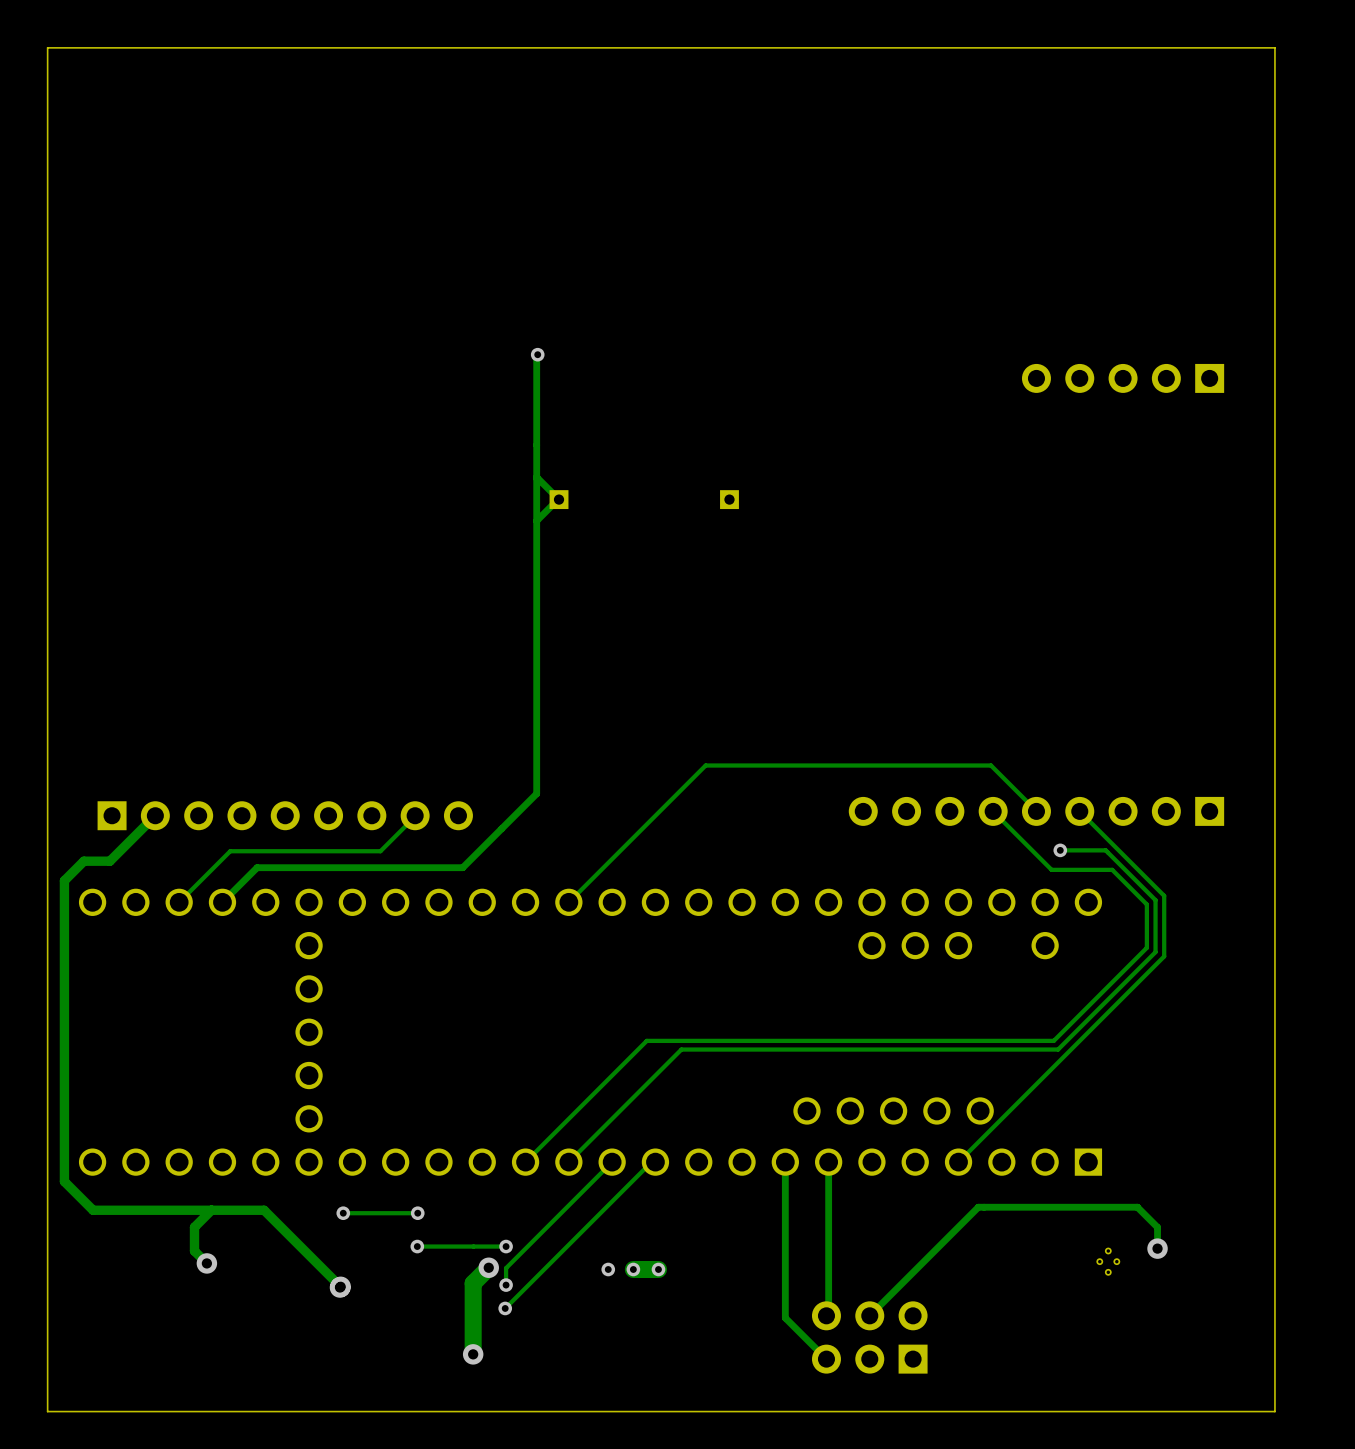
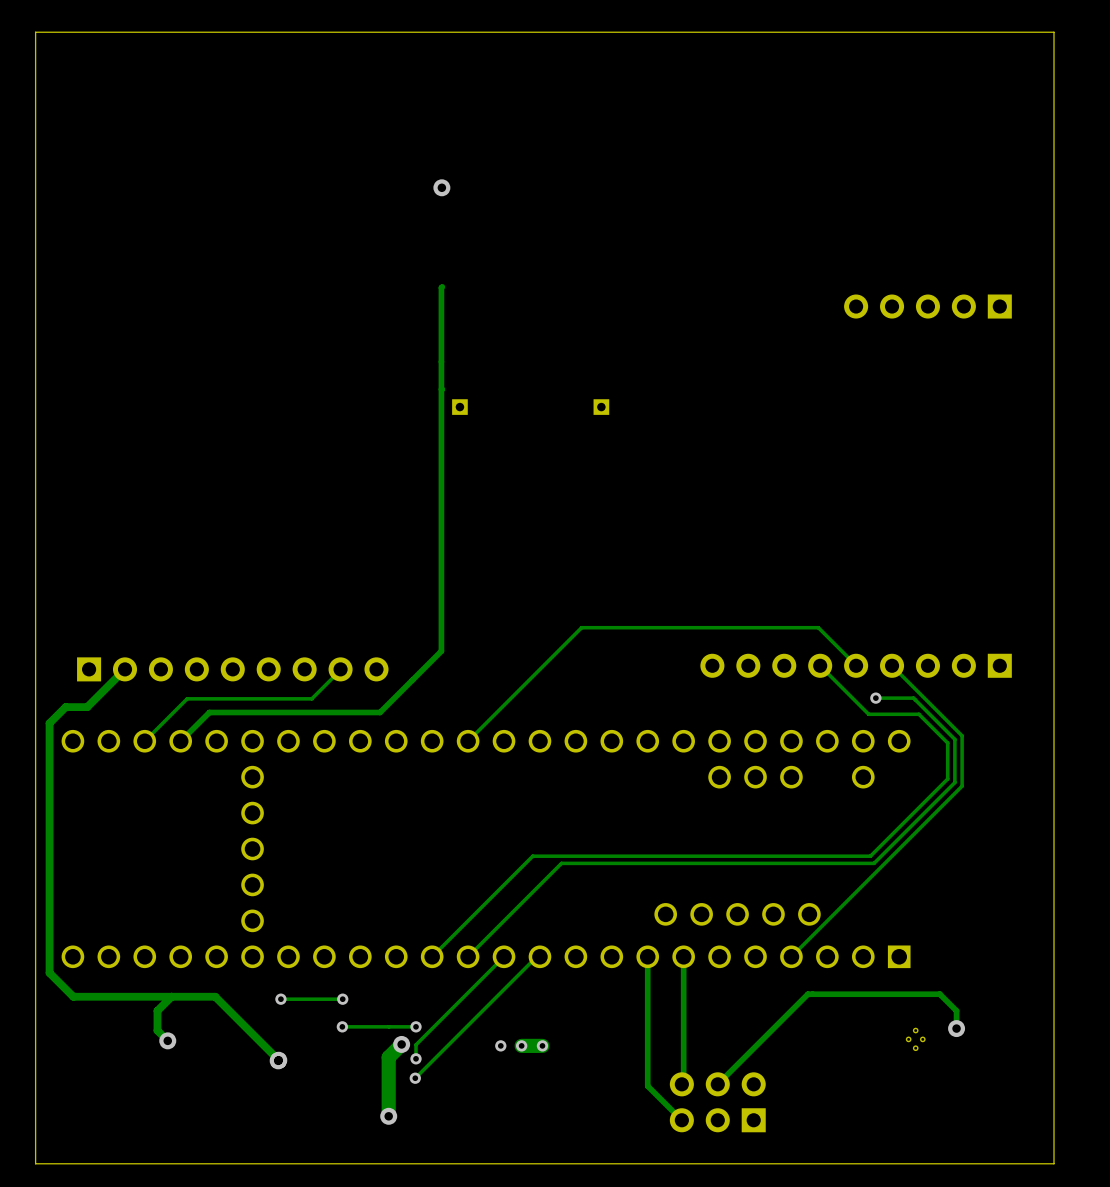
via: none -> (441, 187)
via: (537, 354) -> none
track: (536, 477) (559, 499) (536, 520) -> none

